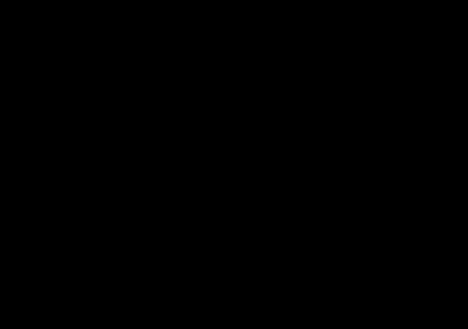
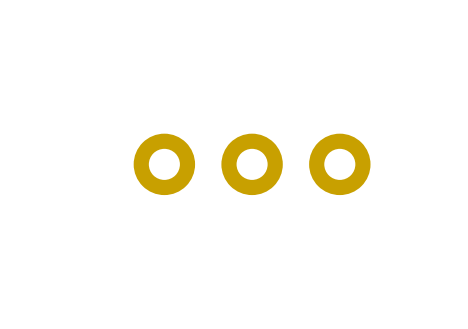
part: none -> (252, 164)

